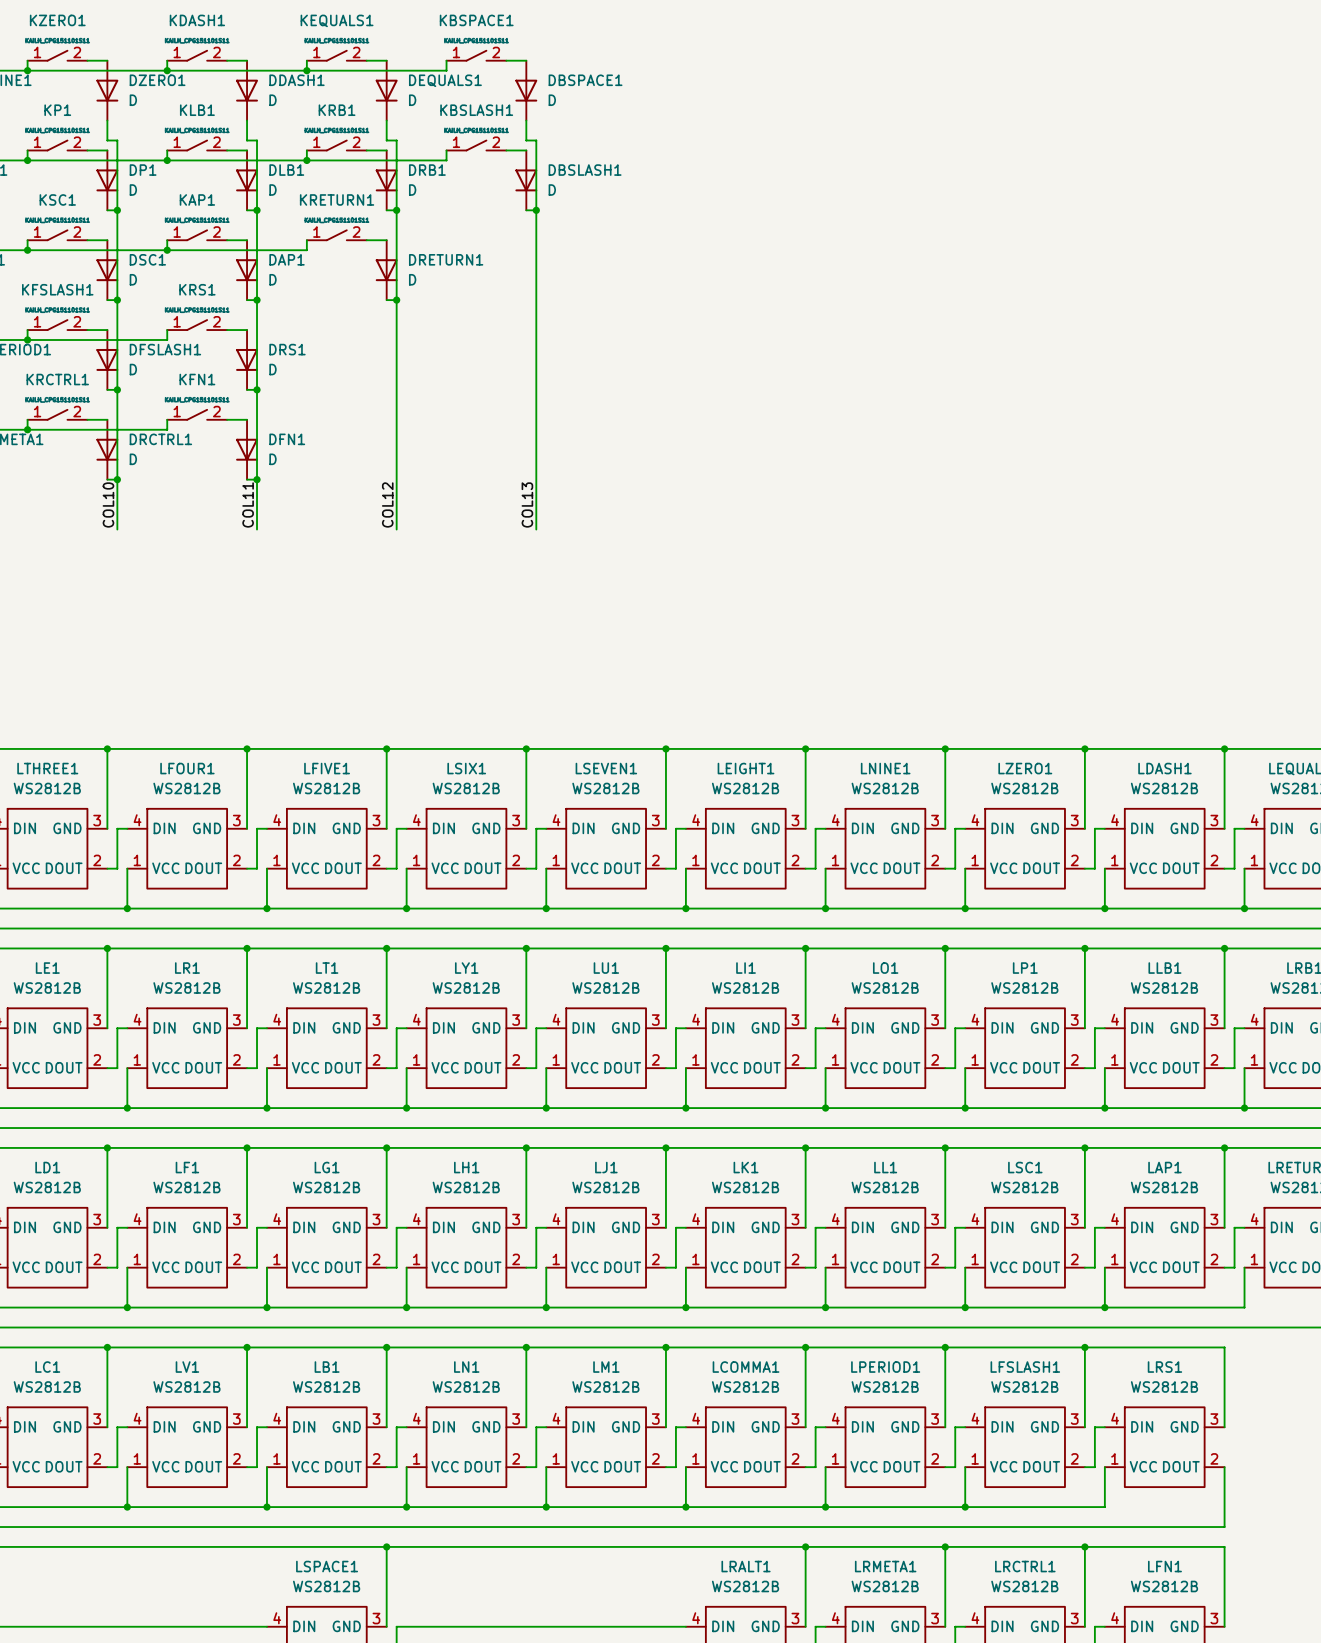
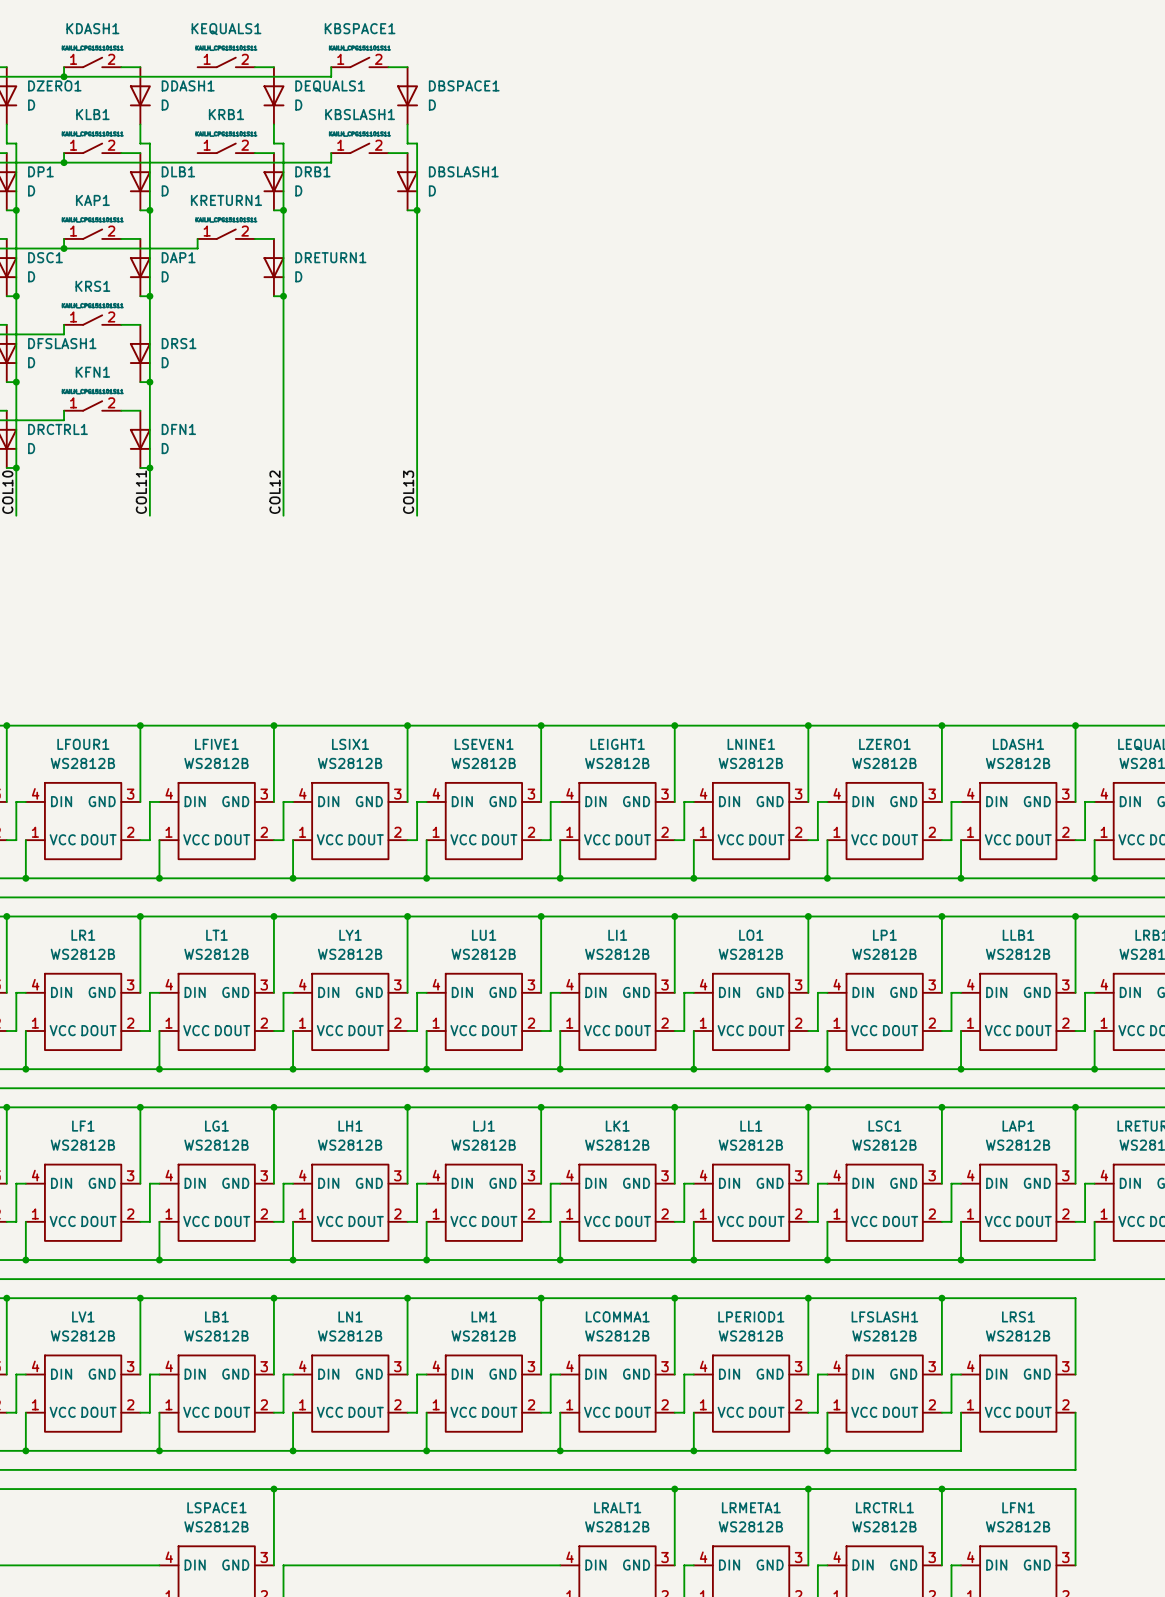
wire: (306, 60) (306, 70) -> none
junction: (306, 70) -> none
wire: (306, 150) (306, 160) -> none
junction: (306, 160) -> none

